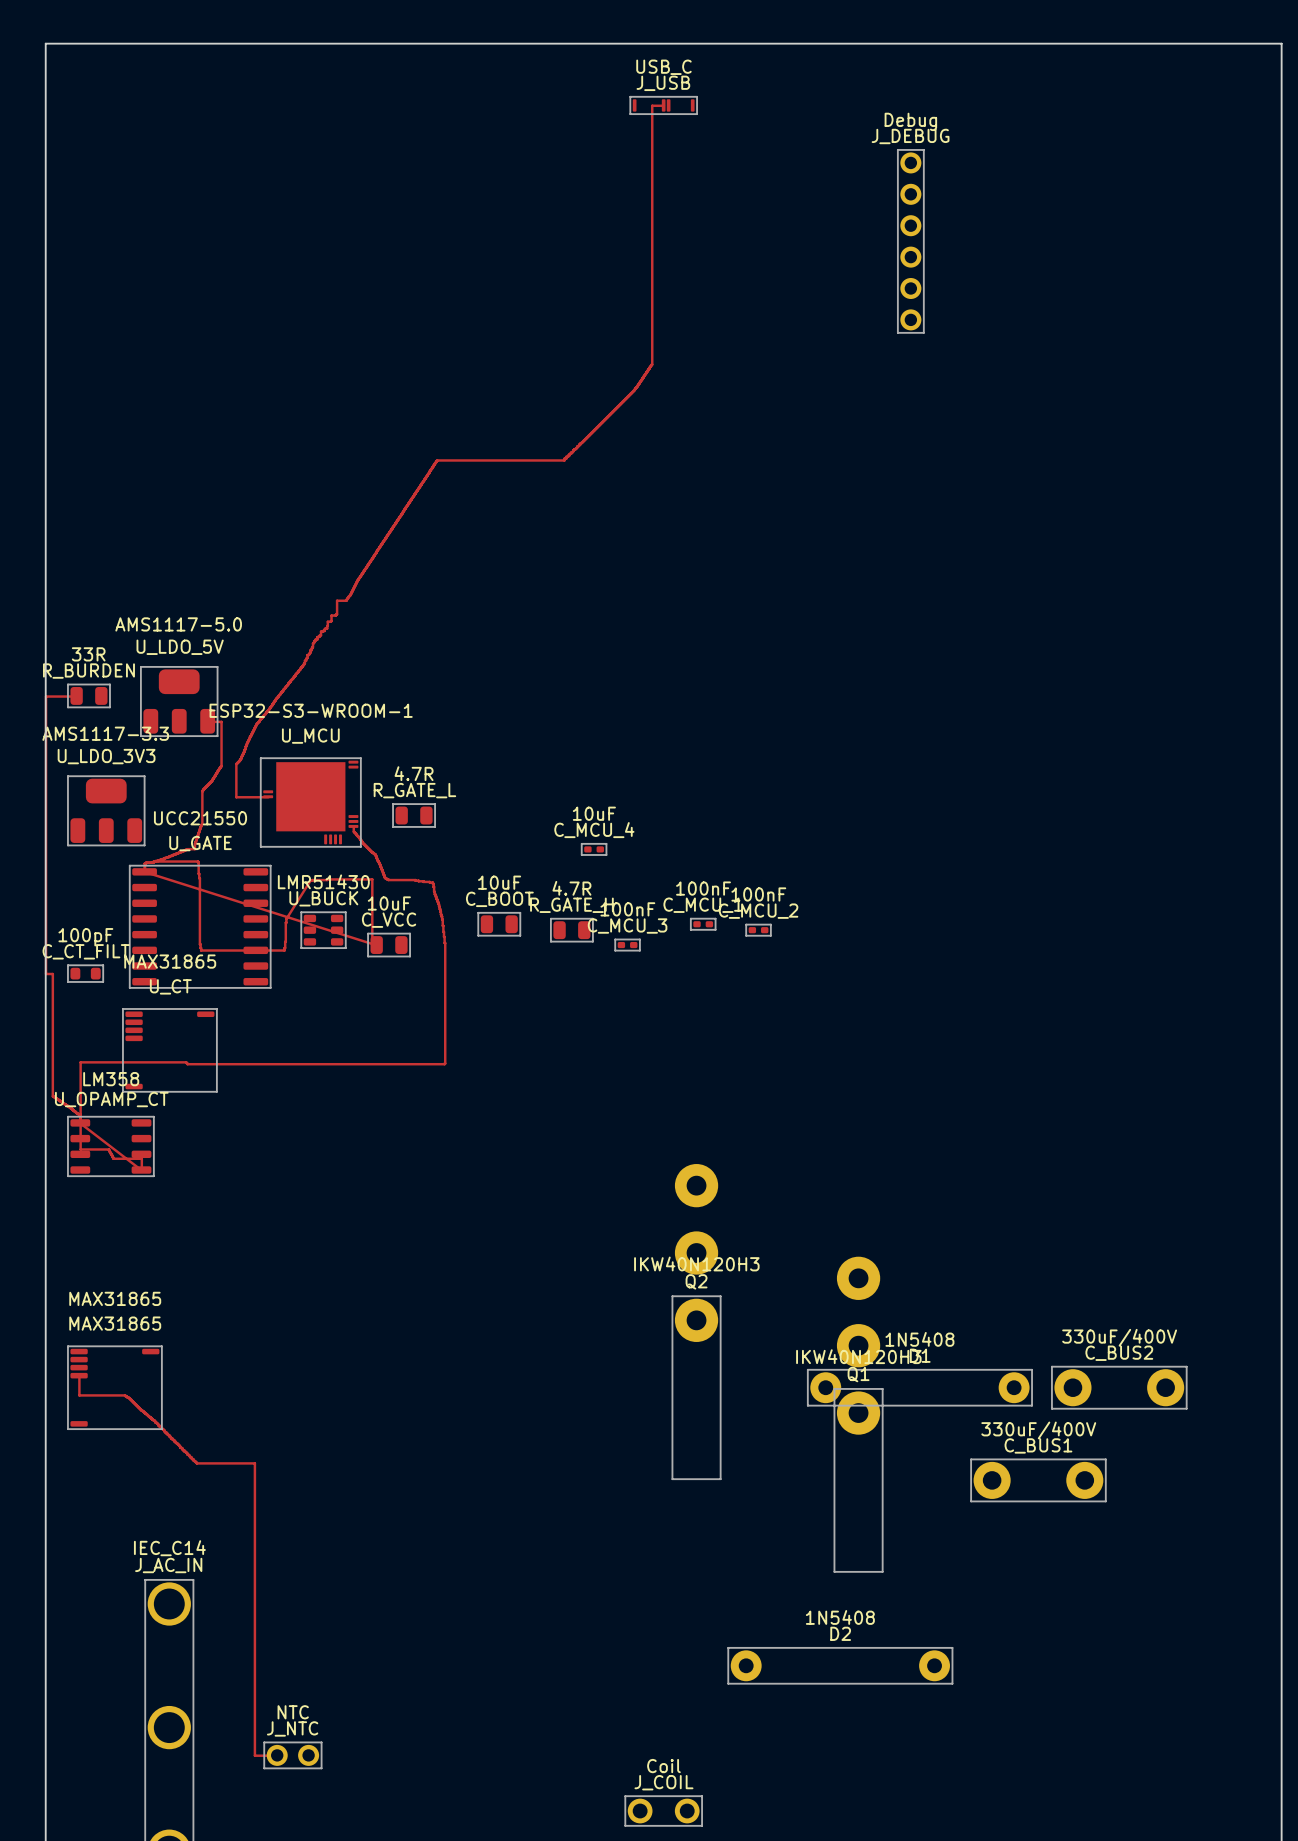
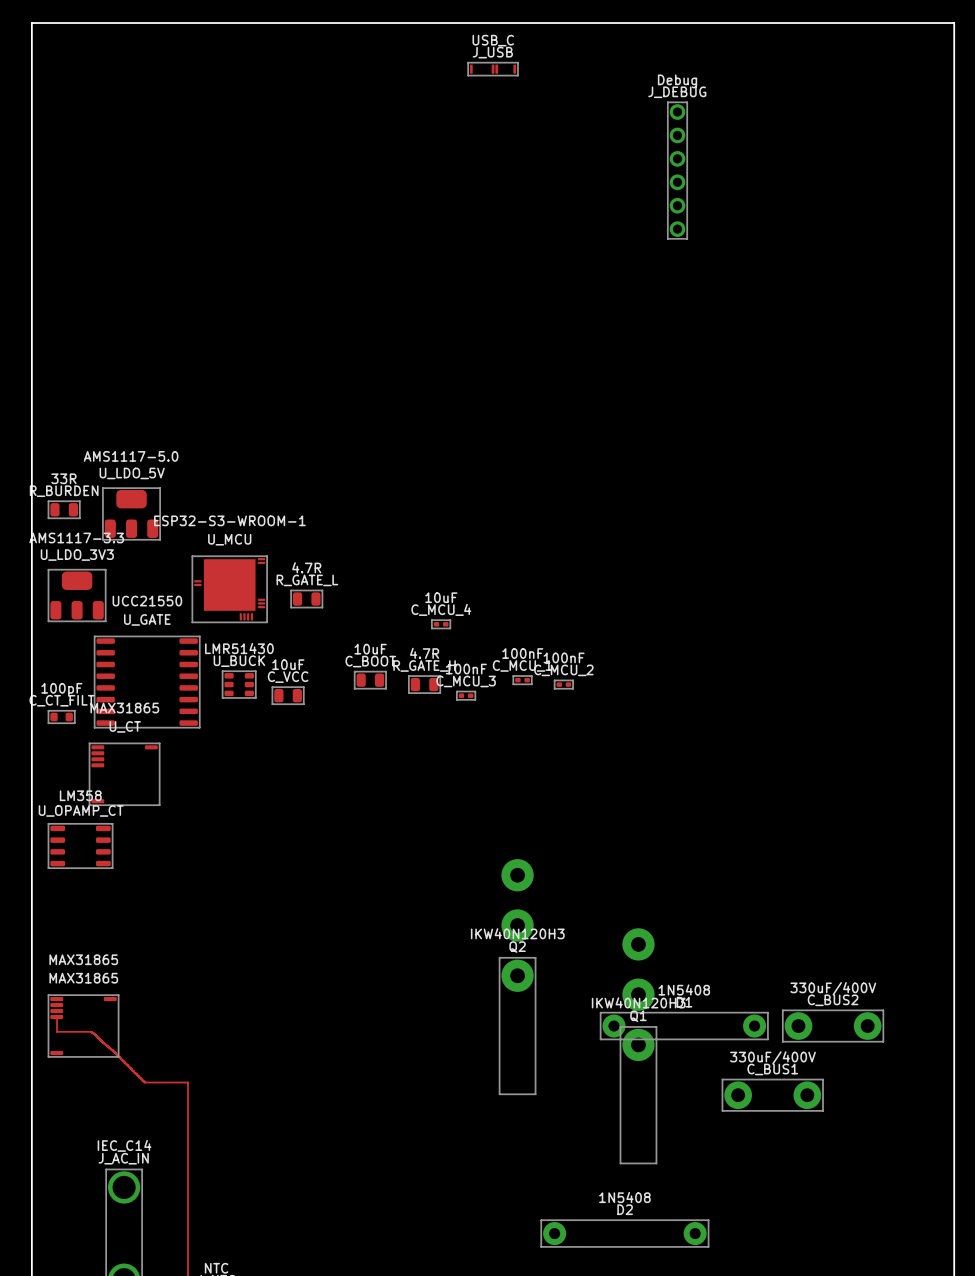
track: (663, 105) (652, 105) (652, 364) (634, 390) (564, 460) (435, 461) (357, 580) (350, 595) (346, 600) (337, 600) (337, 614) (331, 615) (331, 621) (327, 621) (327, 628) (321, 631) (321, 635) (312, 643) (311, 650) (303, 666) (256, 723) (241, 758) (236, 763) (236, 797) (268, 797) -> none
track: (76, 696) (46, 696) (46, 973) (52, 973) (52, 1096) (80, 1114) -> none
track: (207, 721) (221, 721) (221, 766) (212, 781) (202, 791) (202, 824) (194, 843) (194, 849) (187, 849) (156, 861) -> none
track: (353, 826) (353, 831) (362, 842) (375, 854) (385, 878) (415, 880) (433, 883) (442, 919) (445, 943) (445, 1063) (80, 1062) (80, 1149) (109, 1149) (113, 1158) (141, 1158) (141, 1170) (80, 1123) -> none
track: (154, 861) (198, 862) (199, 878) (199, 944) (201, 950) (284, 950) (286, 918) (310, 880) (327, 879) (372, 879) (372, 945) (377, 945) (144, 872) (144, 863) (154, 861) -> none

